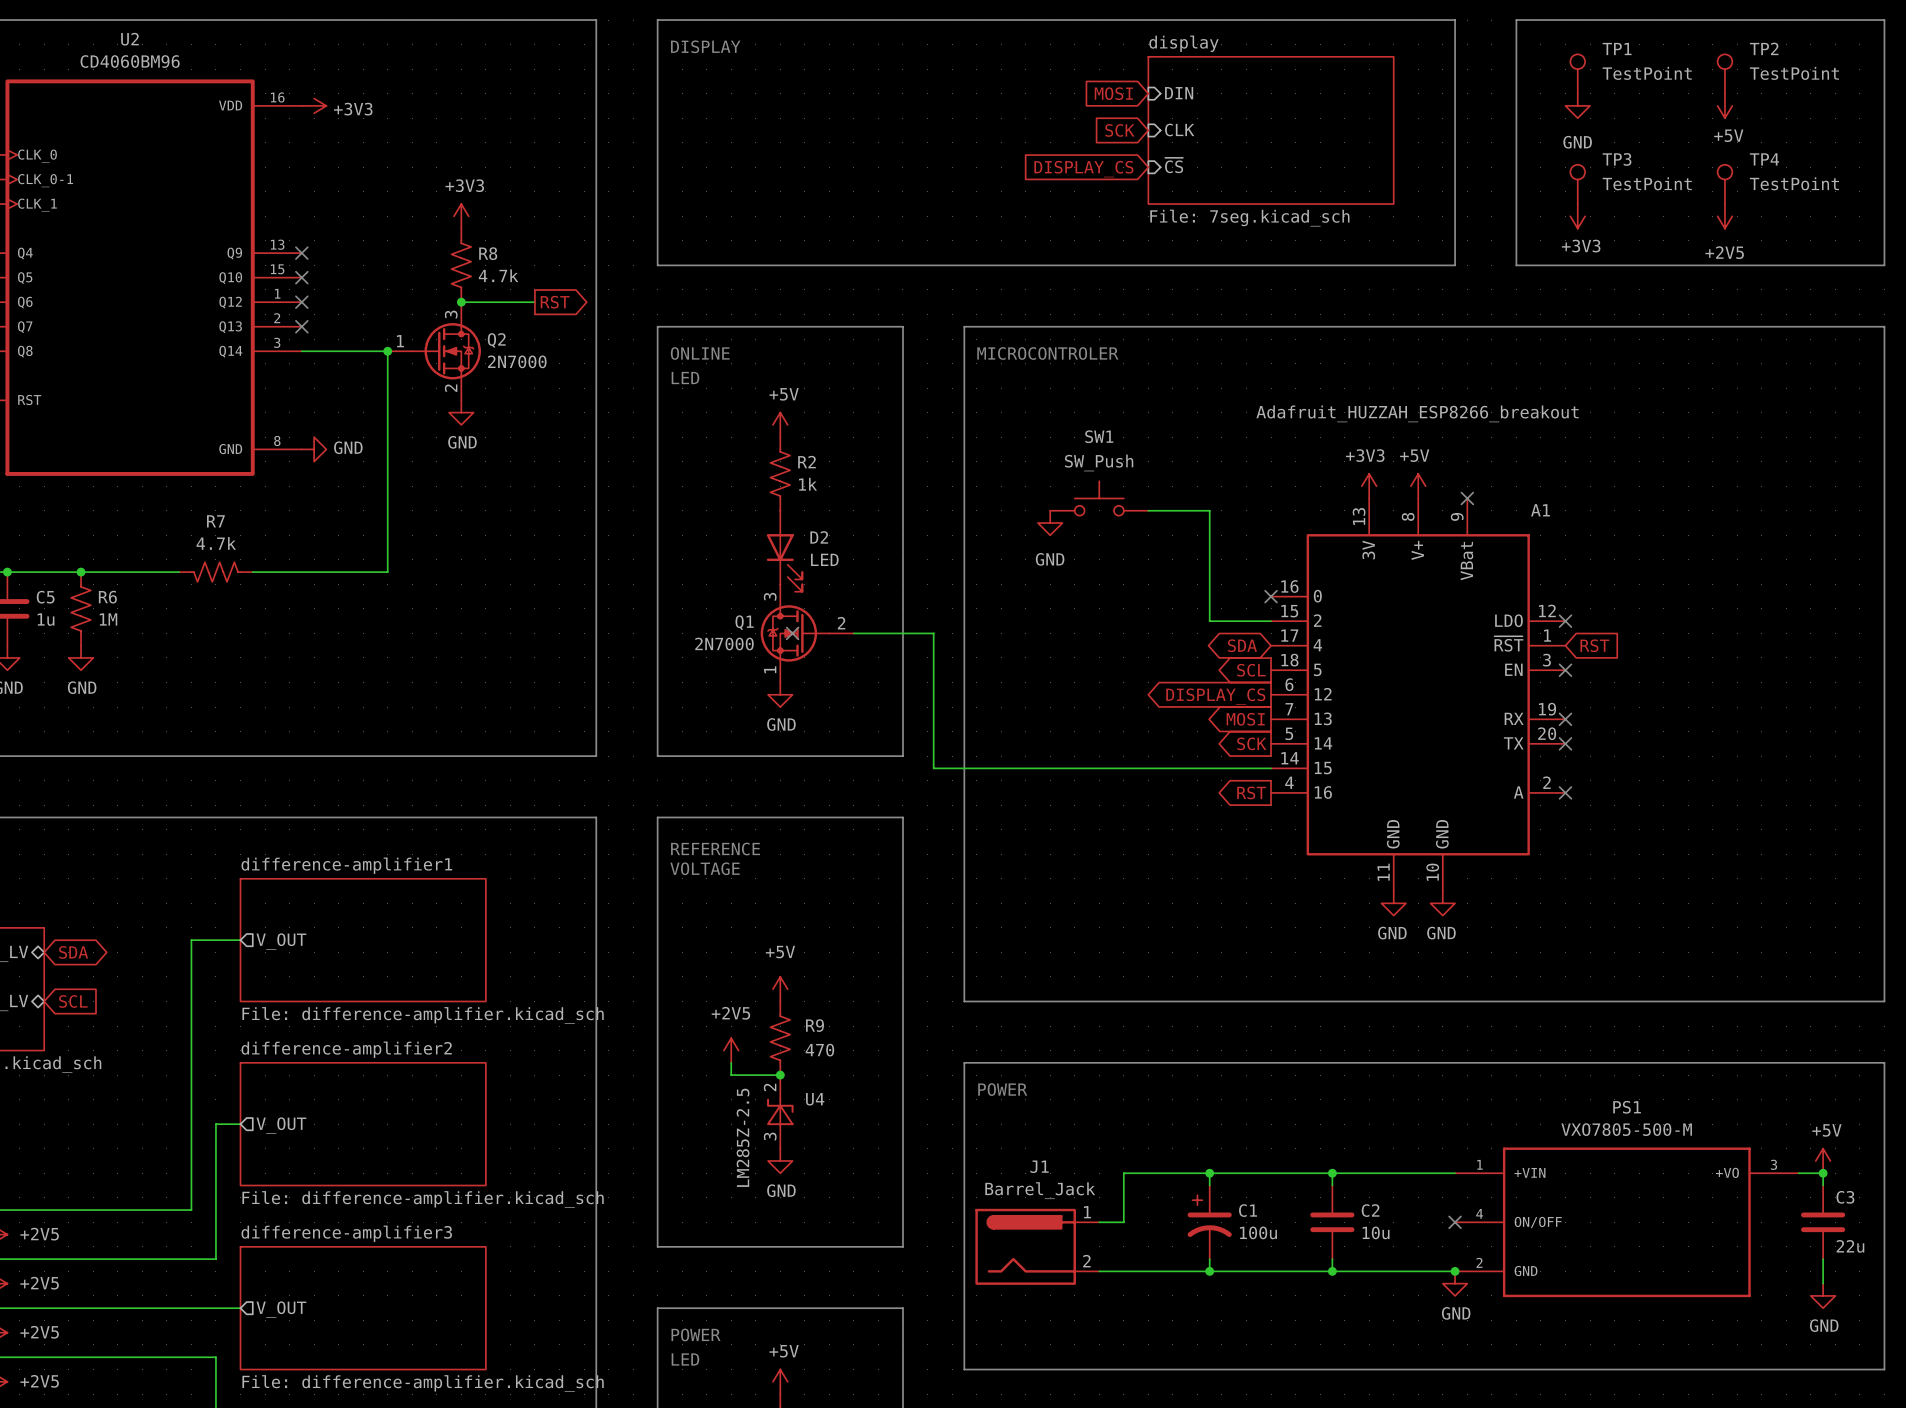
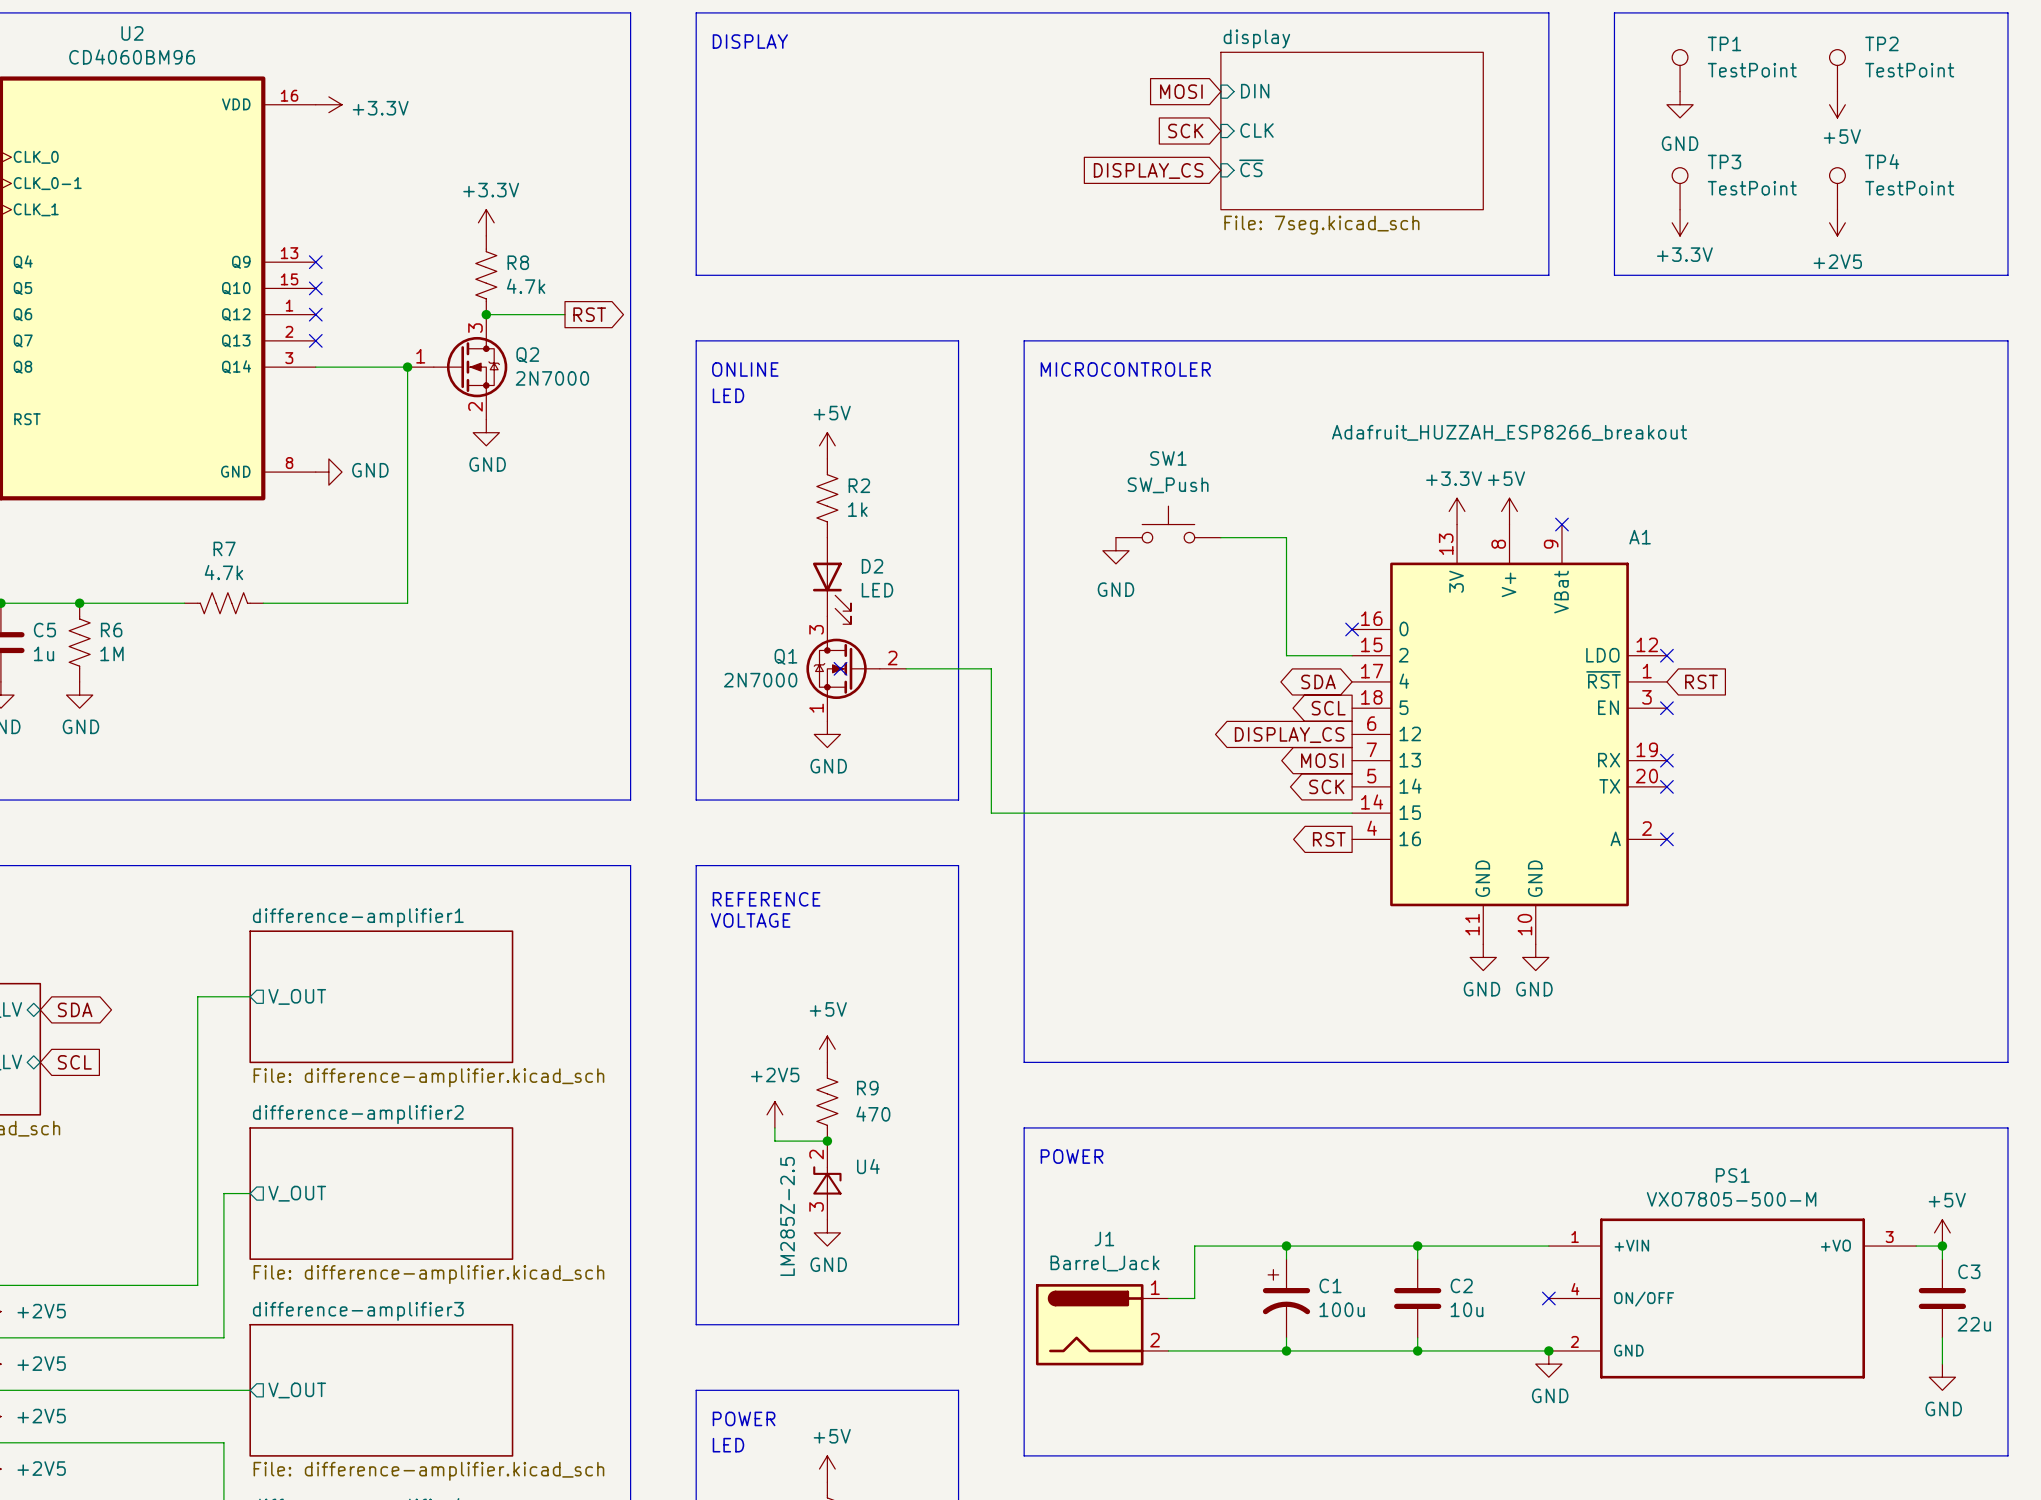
power symbol: +3V3 (314, 105) -> +3.3V (328, 104)
power symbol: +3V3 (461, 216) -> +3.3V (486, 222)
power symbol: +3V3 (1577, 216) -> +3.3V (1680, 222)
power symbol: +3V3 (1369, 486) -> +3.3V (1457, 511)

